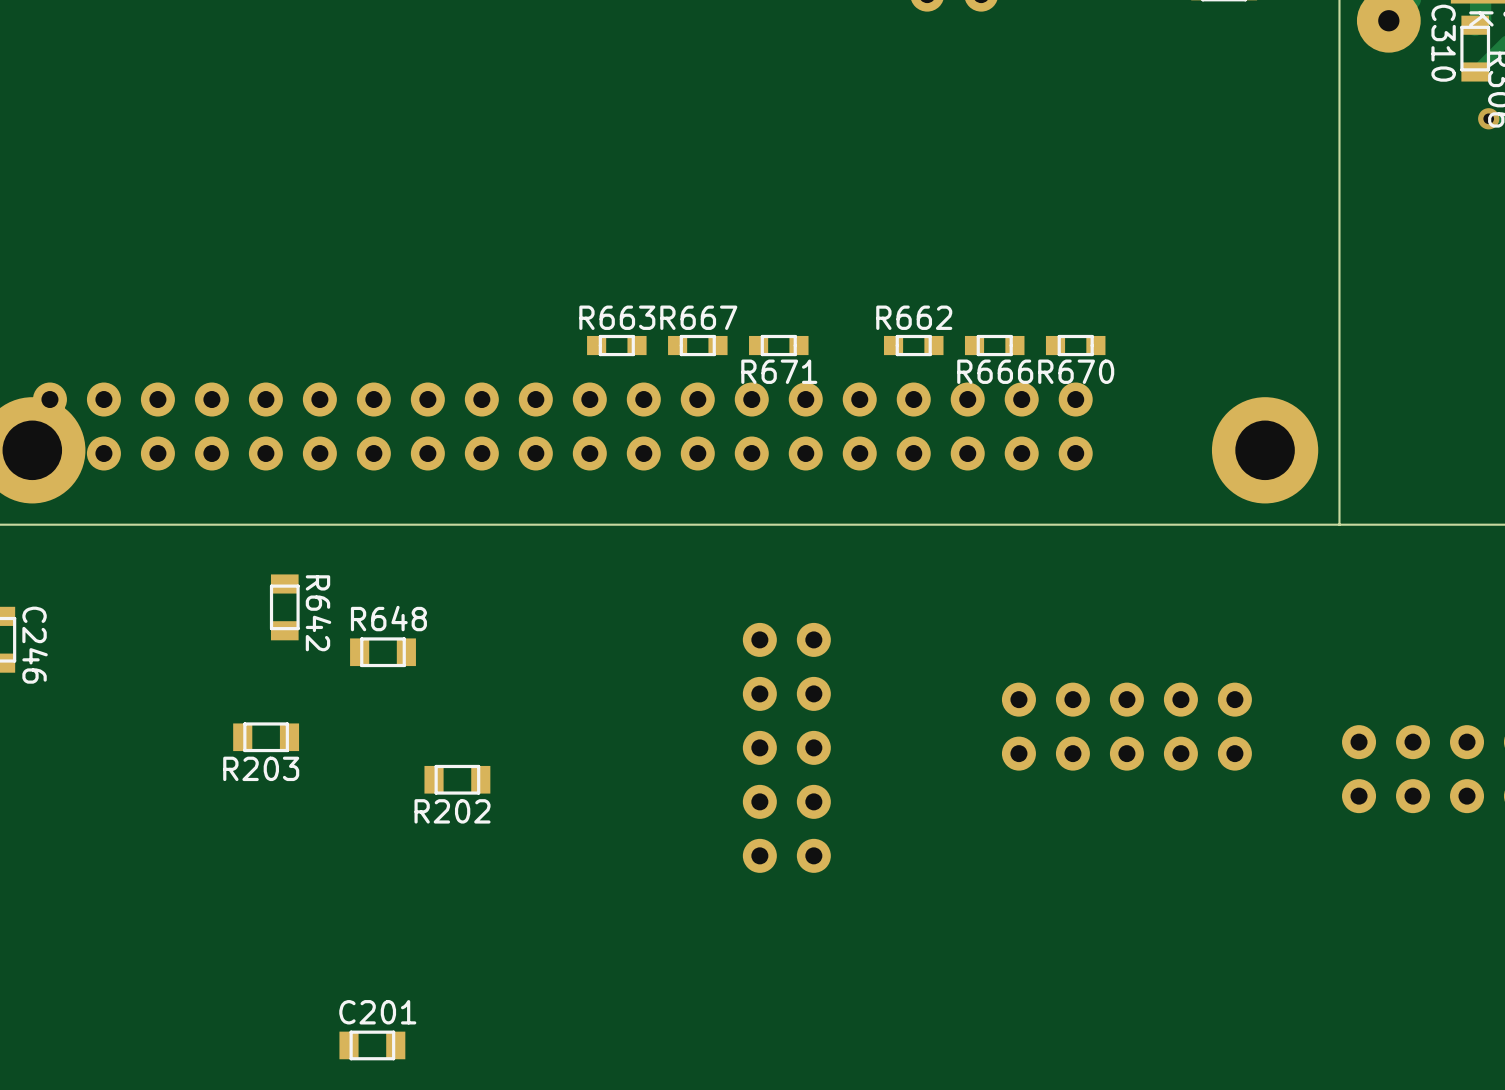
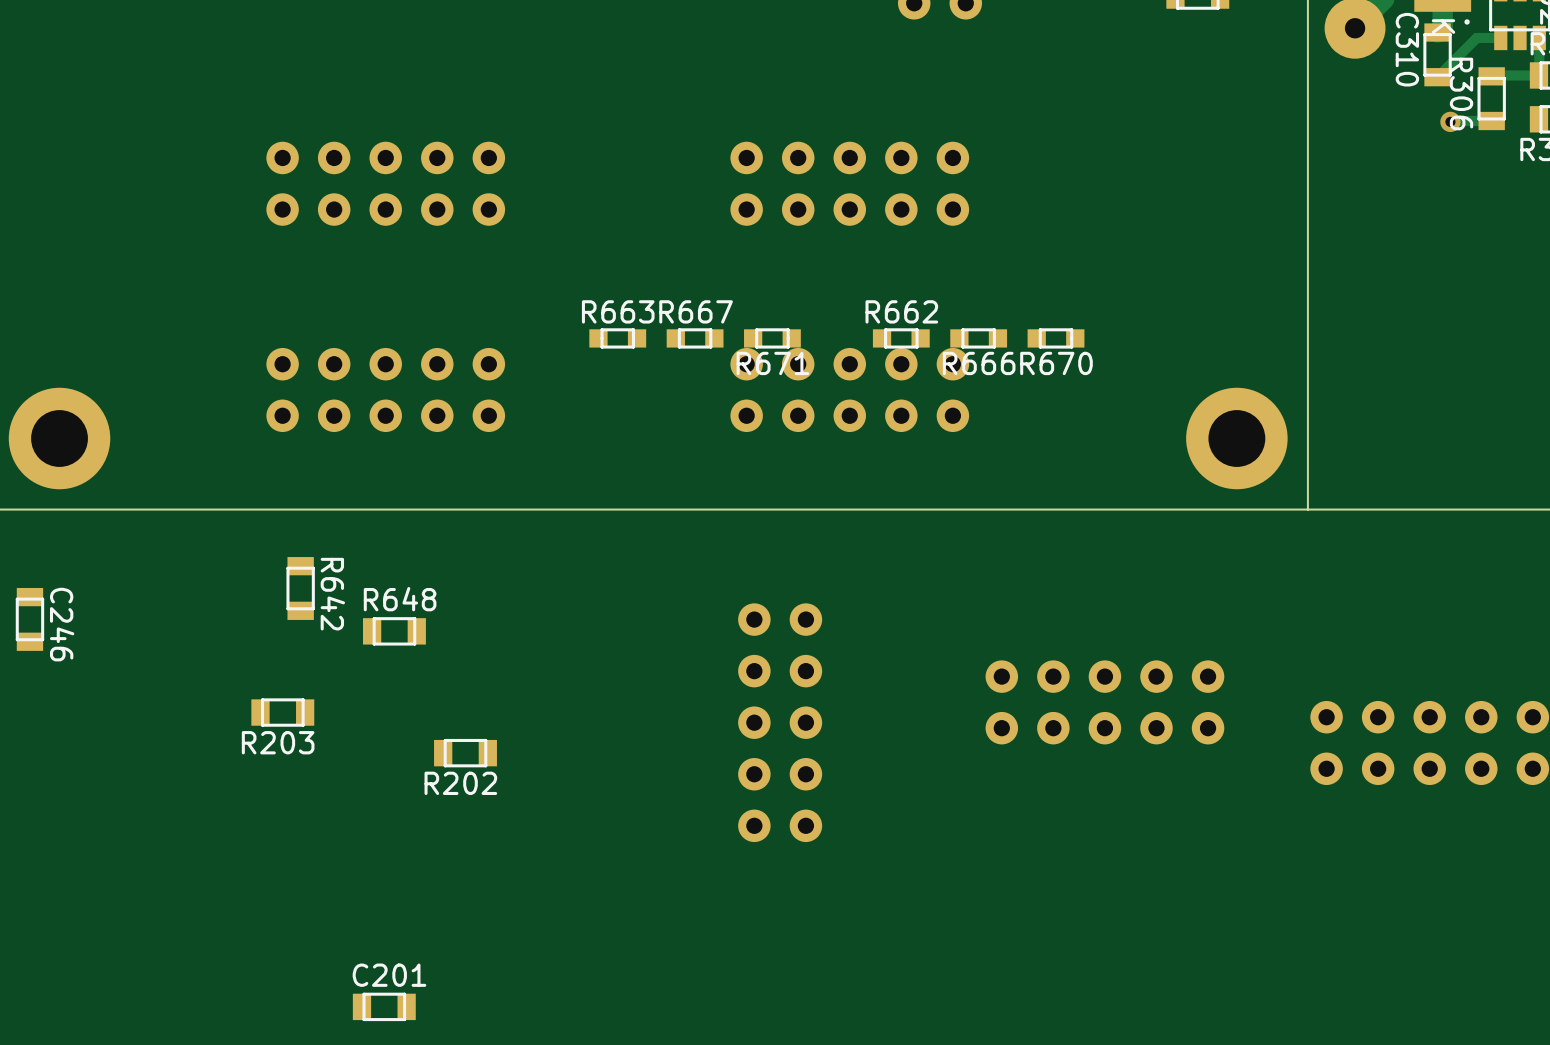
part: none -> (385, 183)
part: none -> (849, 183)
part: none -> (849, 389)
part: (157, 426) -> none
part position: (427, 426) -> (385, 389)
part: (697, 426) -> none
part: (967, 426) -> none

